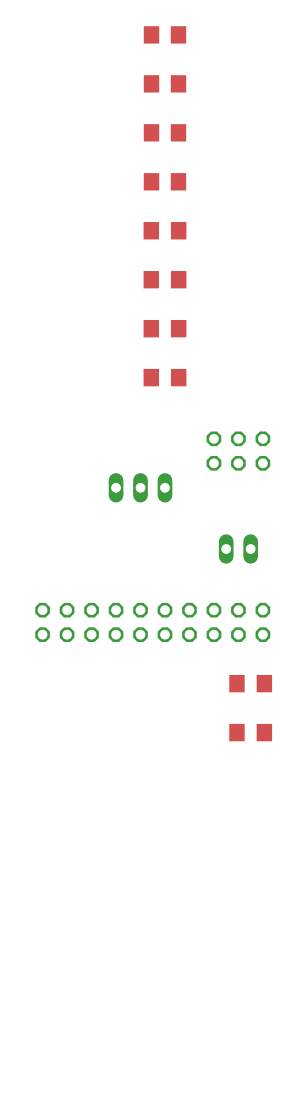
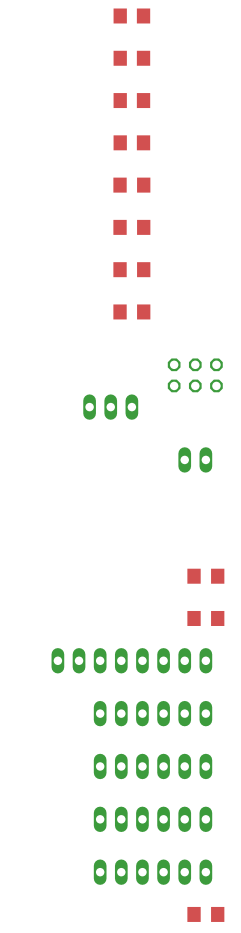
part: (152, 622) -> none
part: none -> (131, 660)
part: none -> (153, 713)
part: none -> (153, 766)
part: none -> (153, 819)
part: none -> (153, 872)
part: none -> (205, 914)

